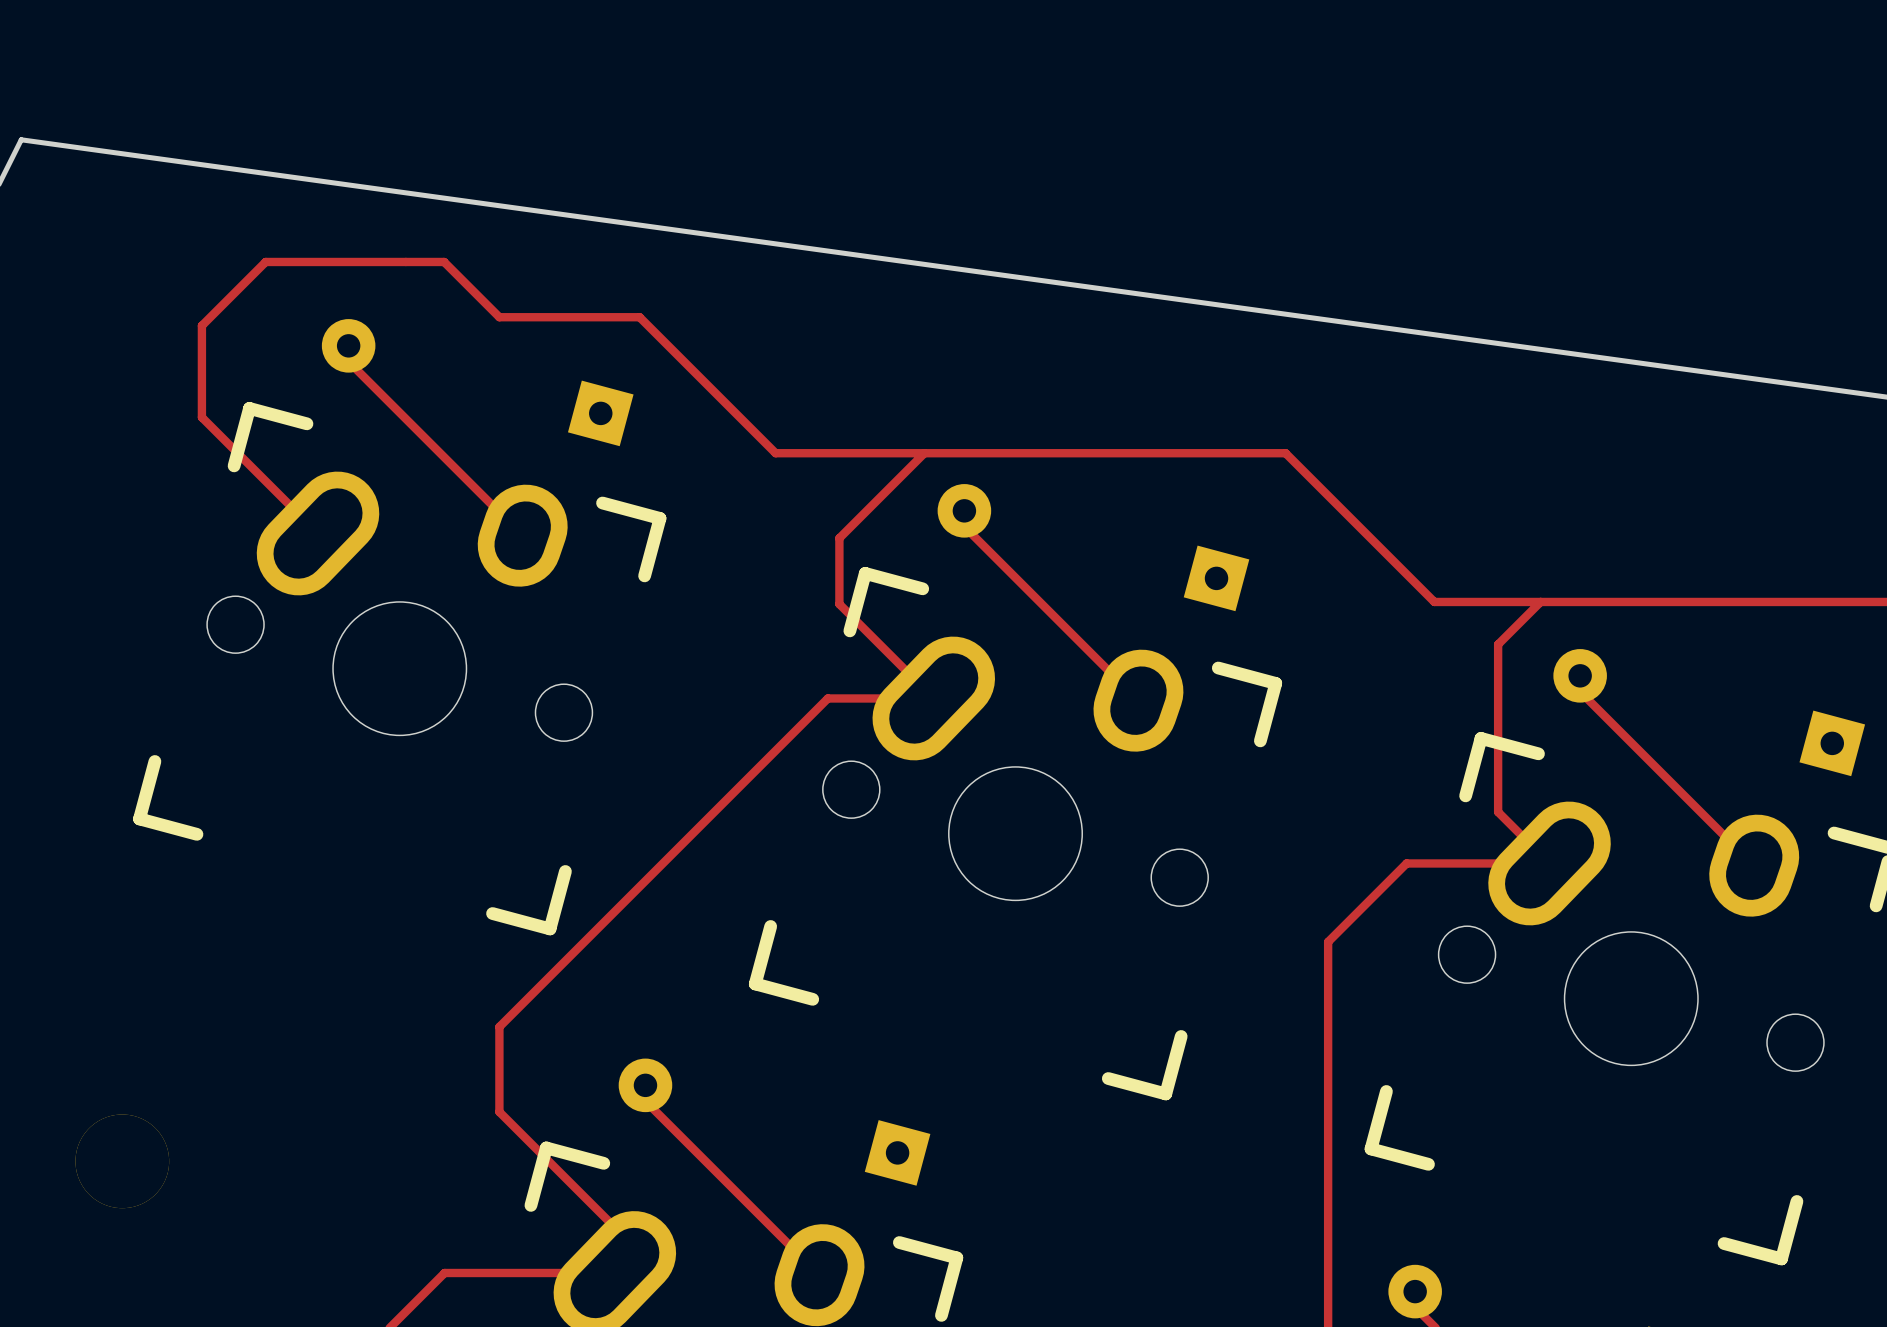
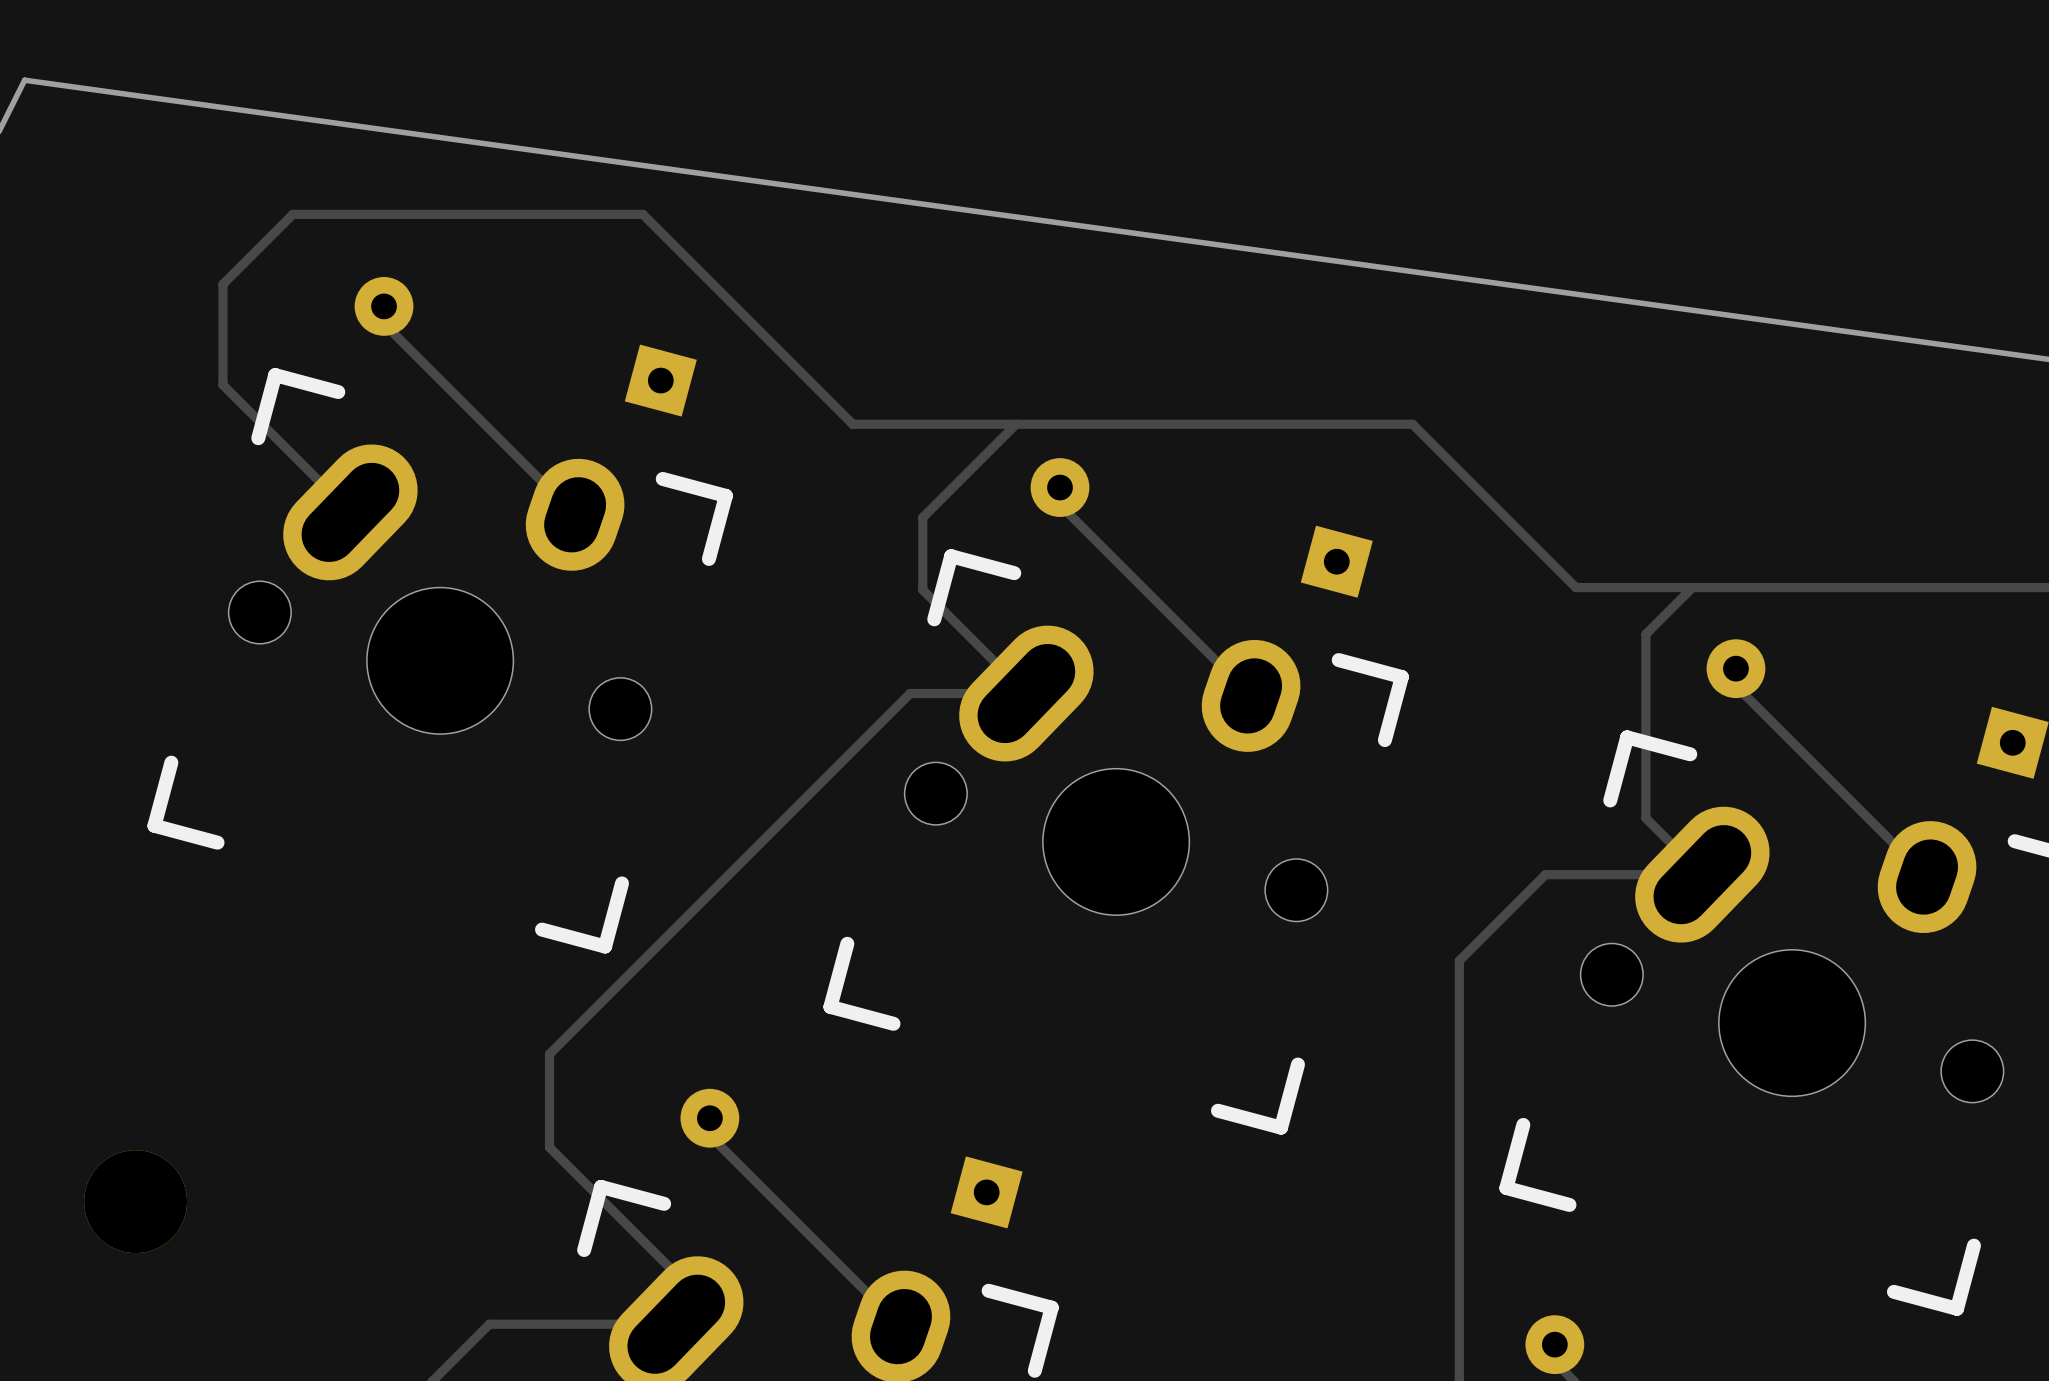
track: (444, 261) (499, 317) (639, 317) -> (488, 214) (642, 214) (703, 274)

